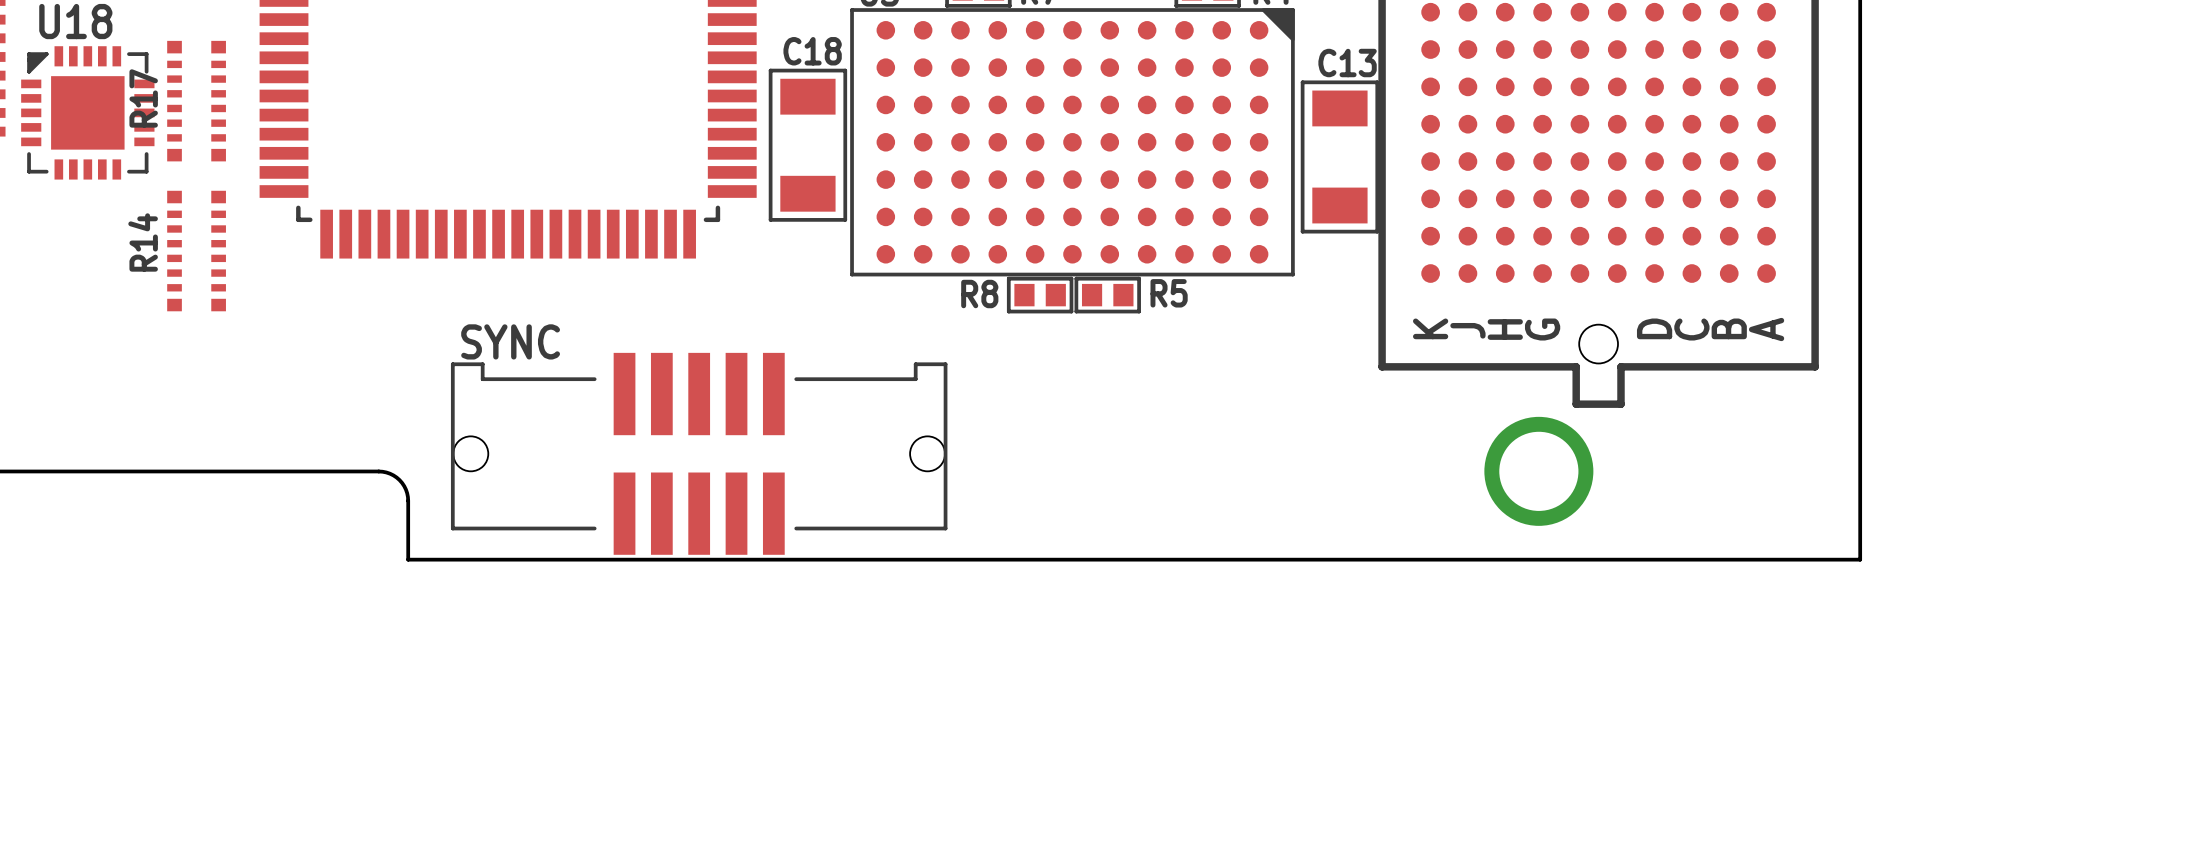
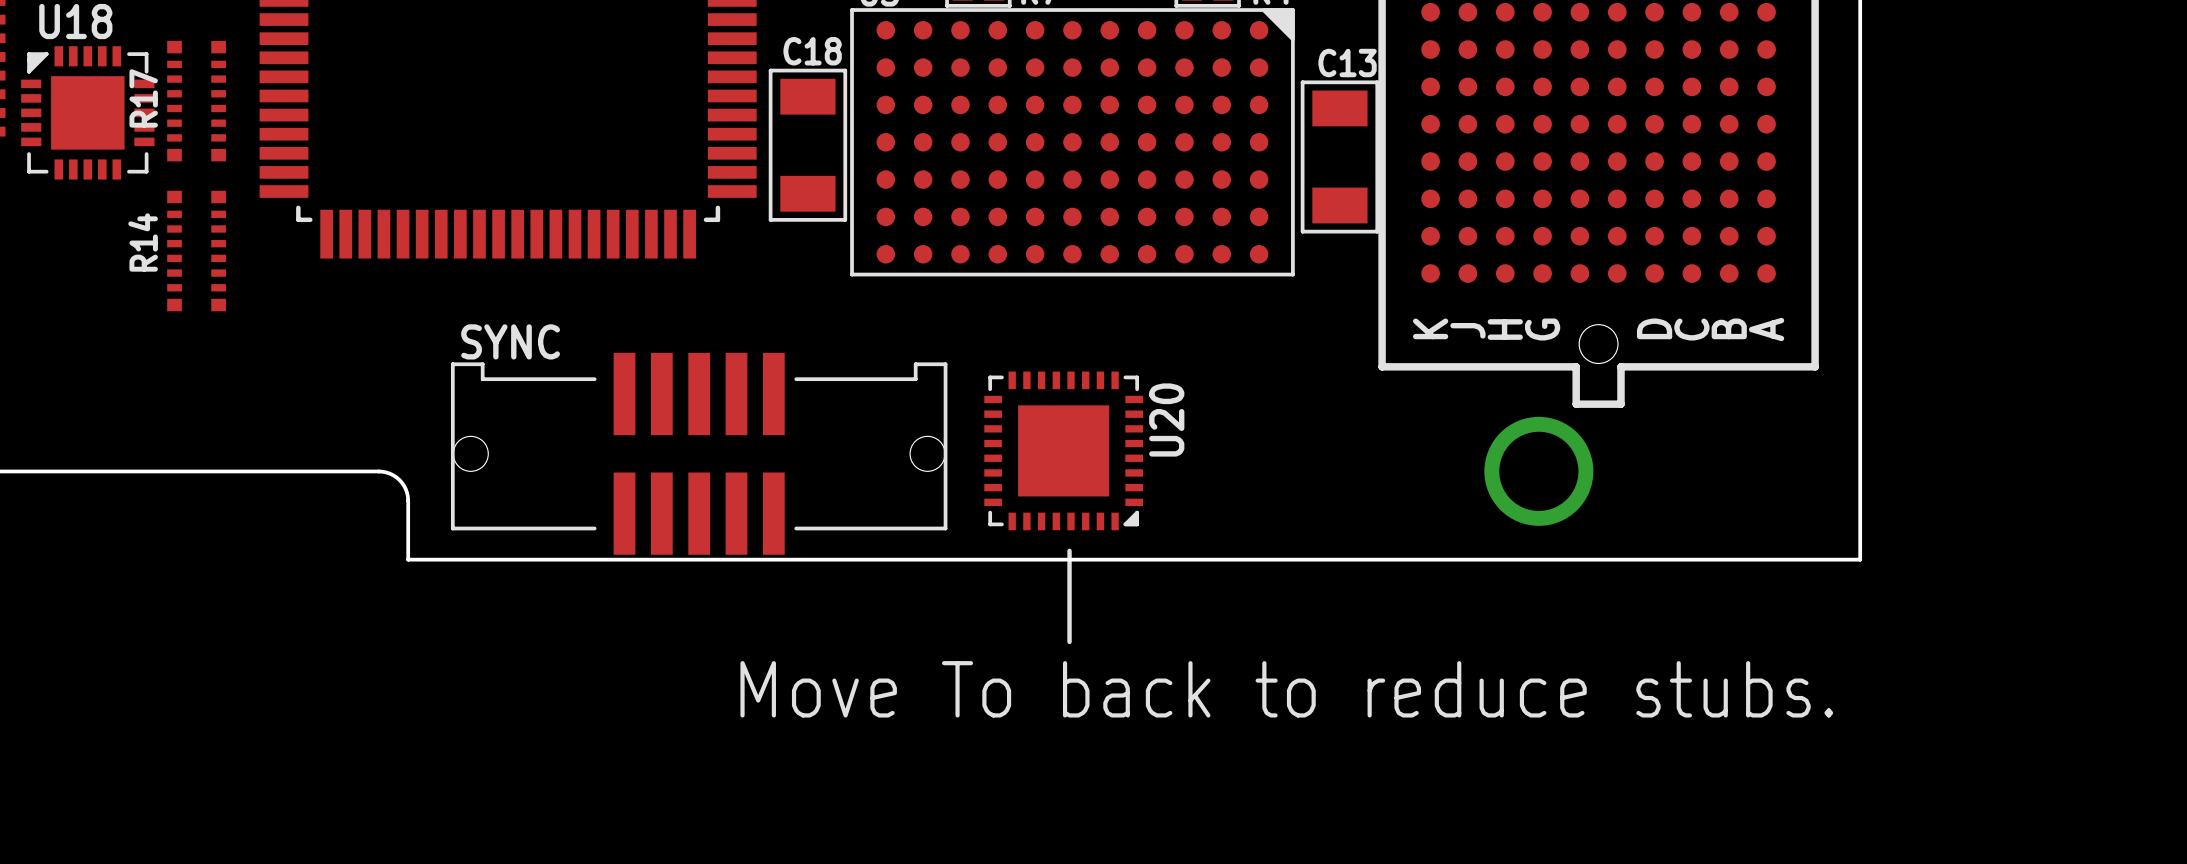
R8: (1040, 295) -> none
R5: (1107, 295) -> none
U20: none -> (1063, 450)
line: none -> (1069, 550) (1069, 641)
text: none -> Move To back to reduce stubs. (1286, 689)

